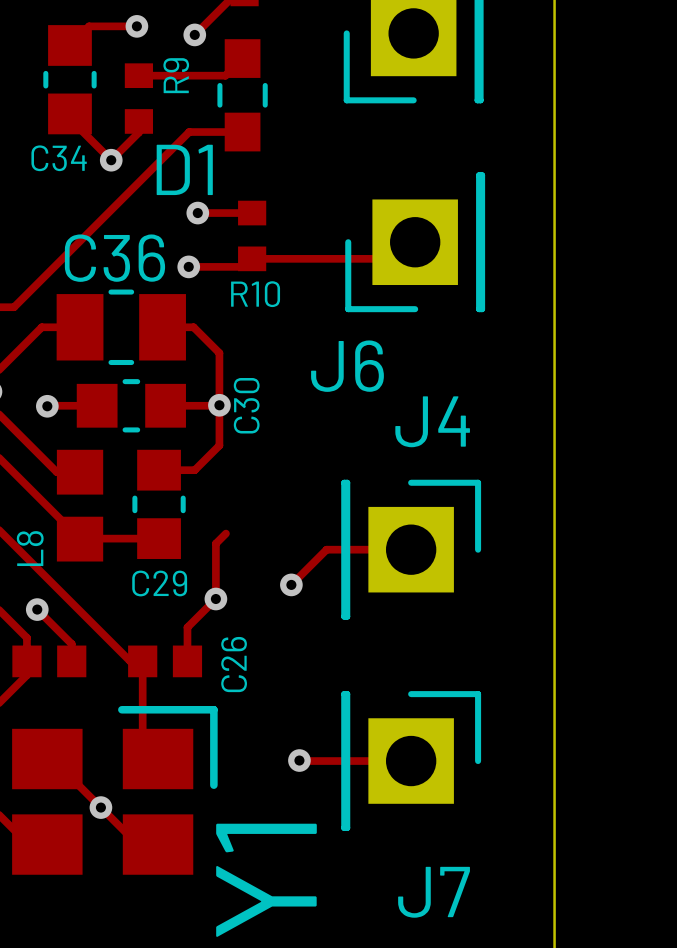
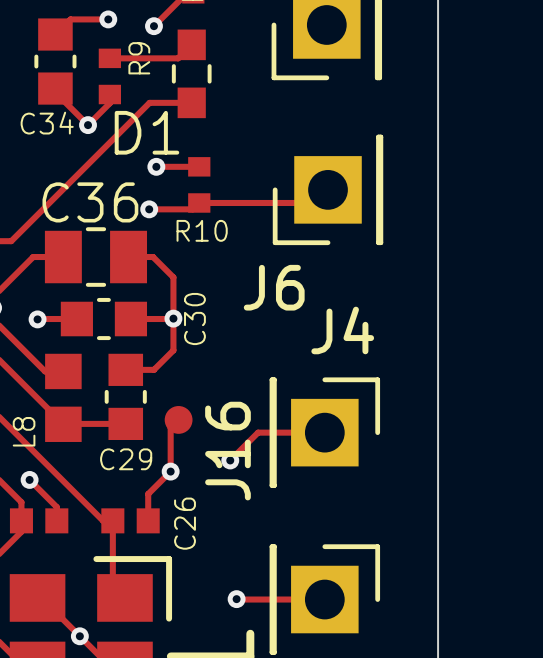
J16: none -> (178, 419)

